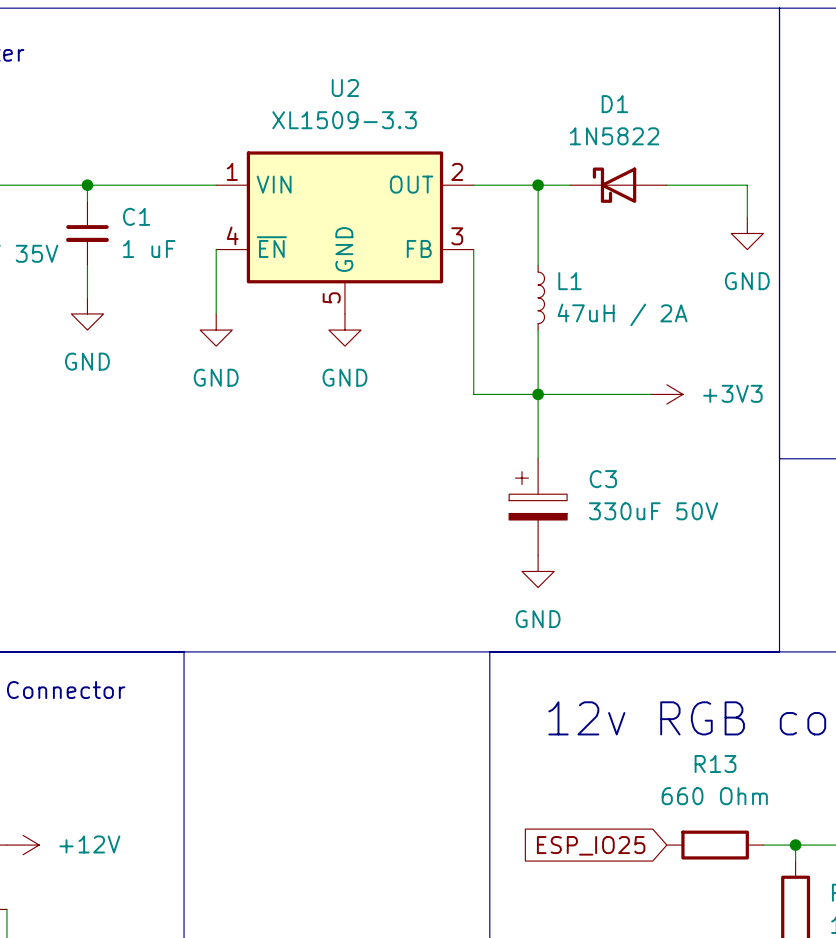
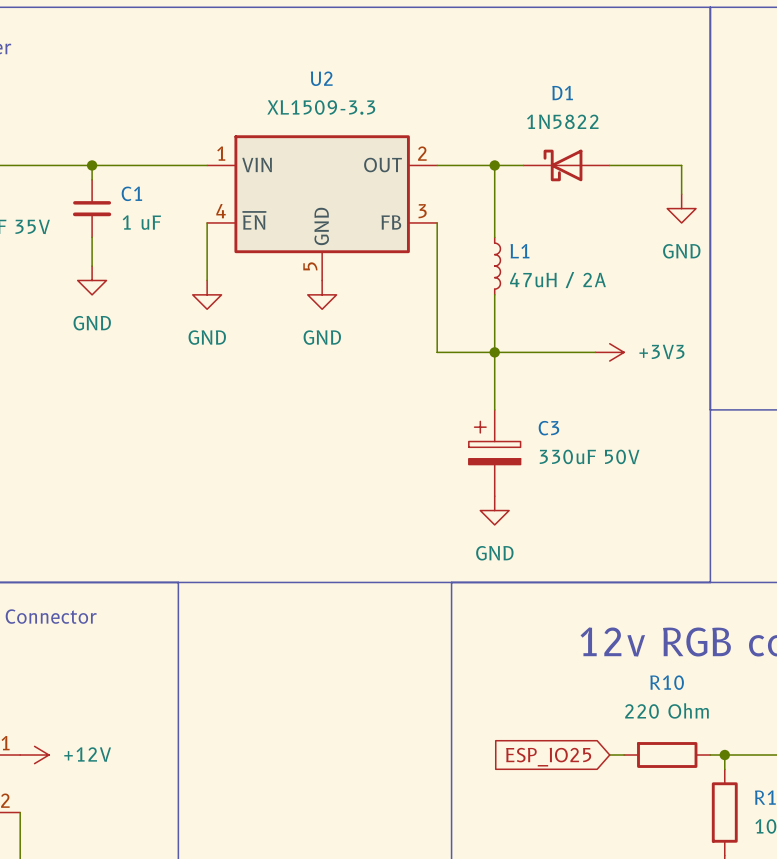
R13: 660 Ohm (715, 845) -> none
R10: none -> 220 Ohm (667, 755)

